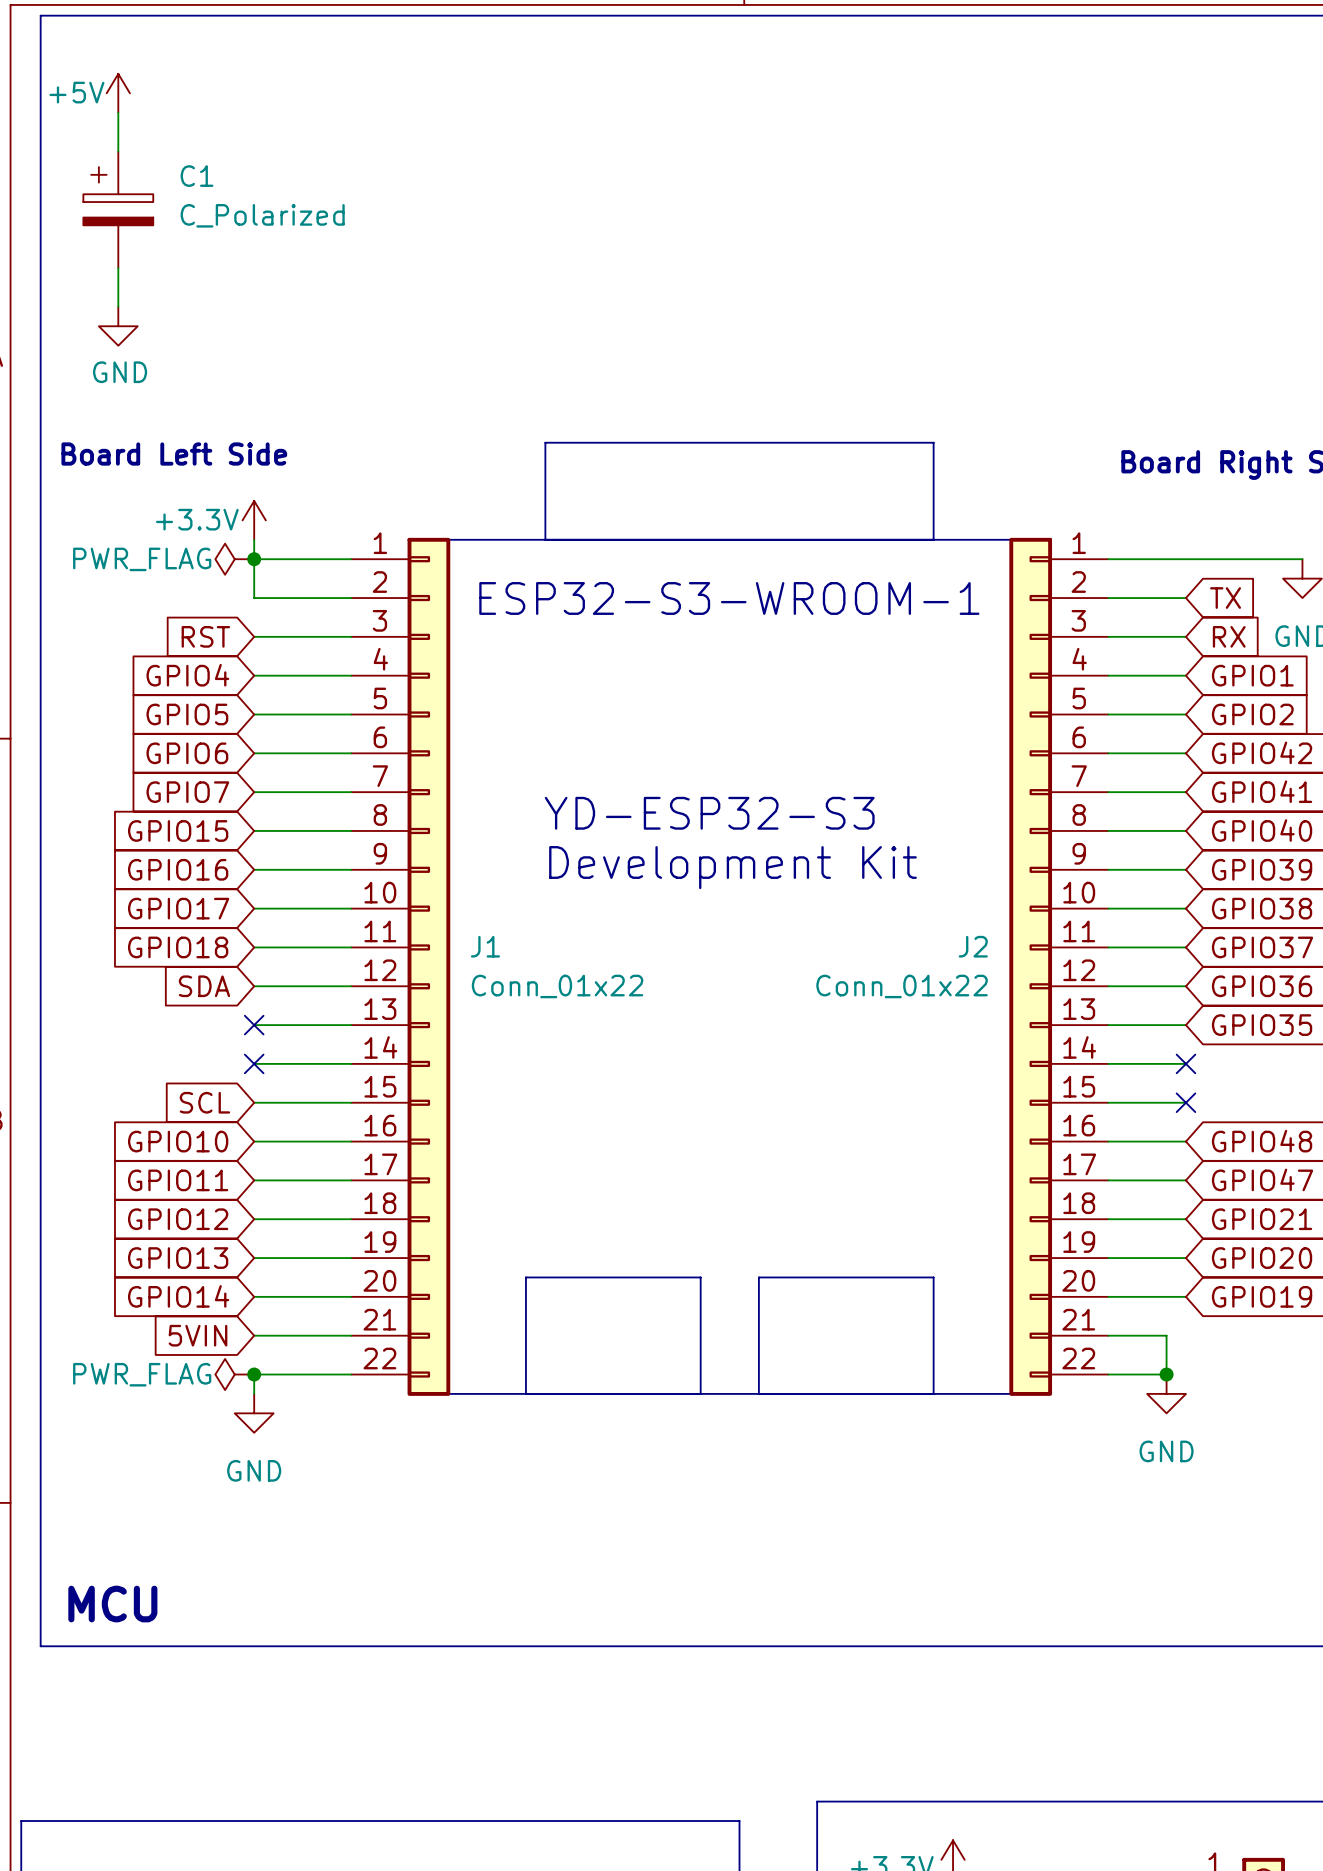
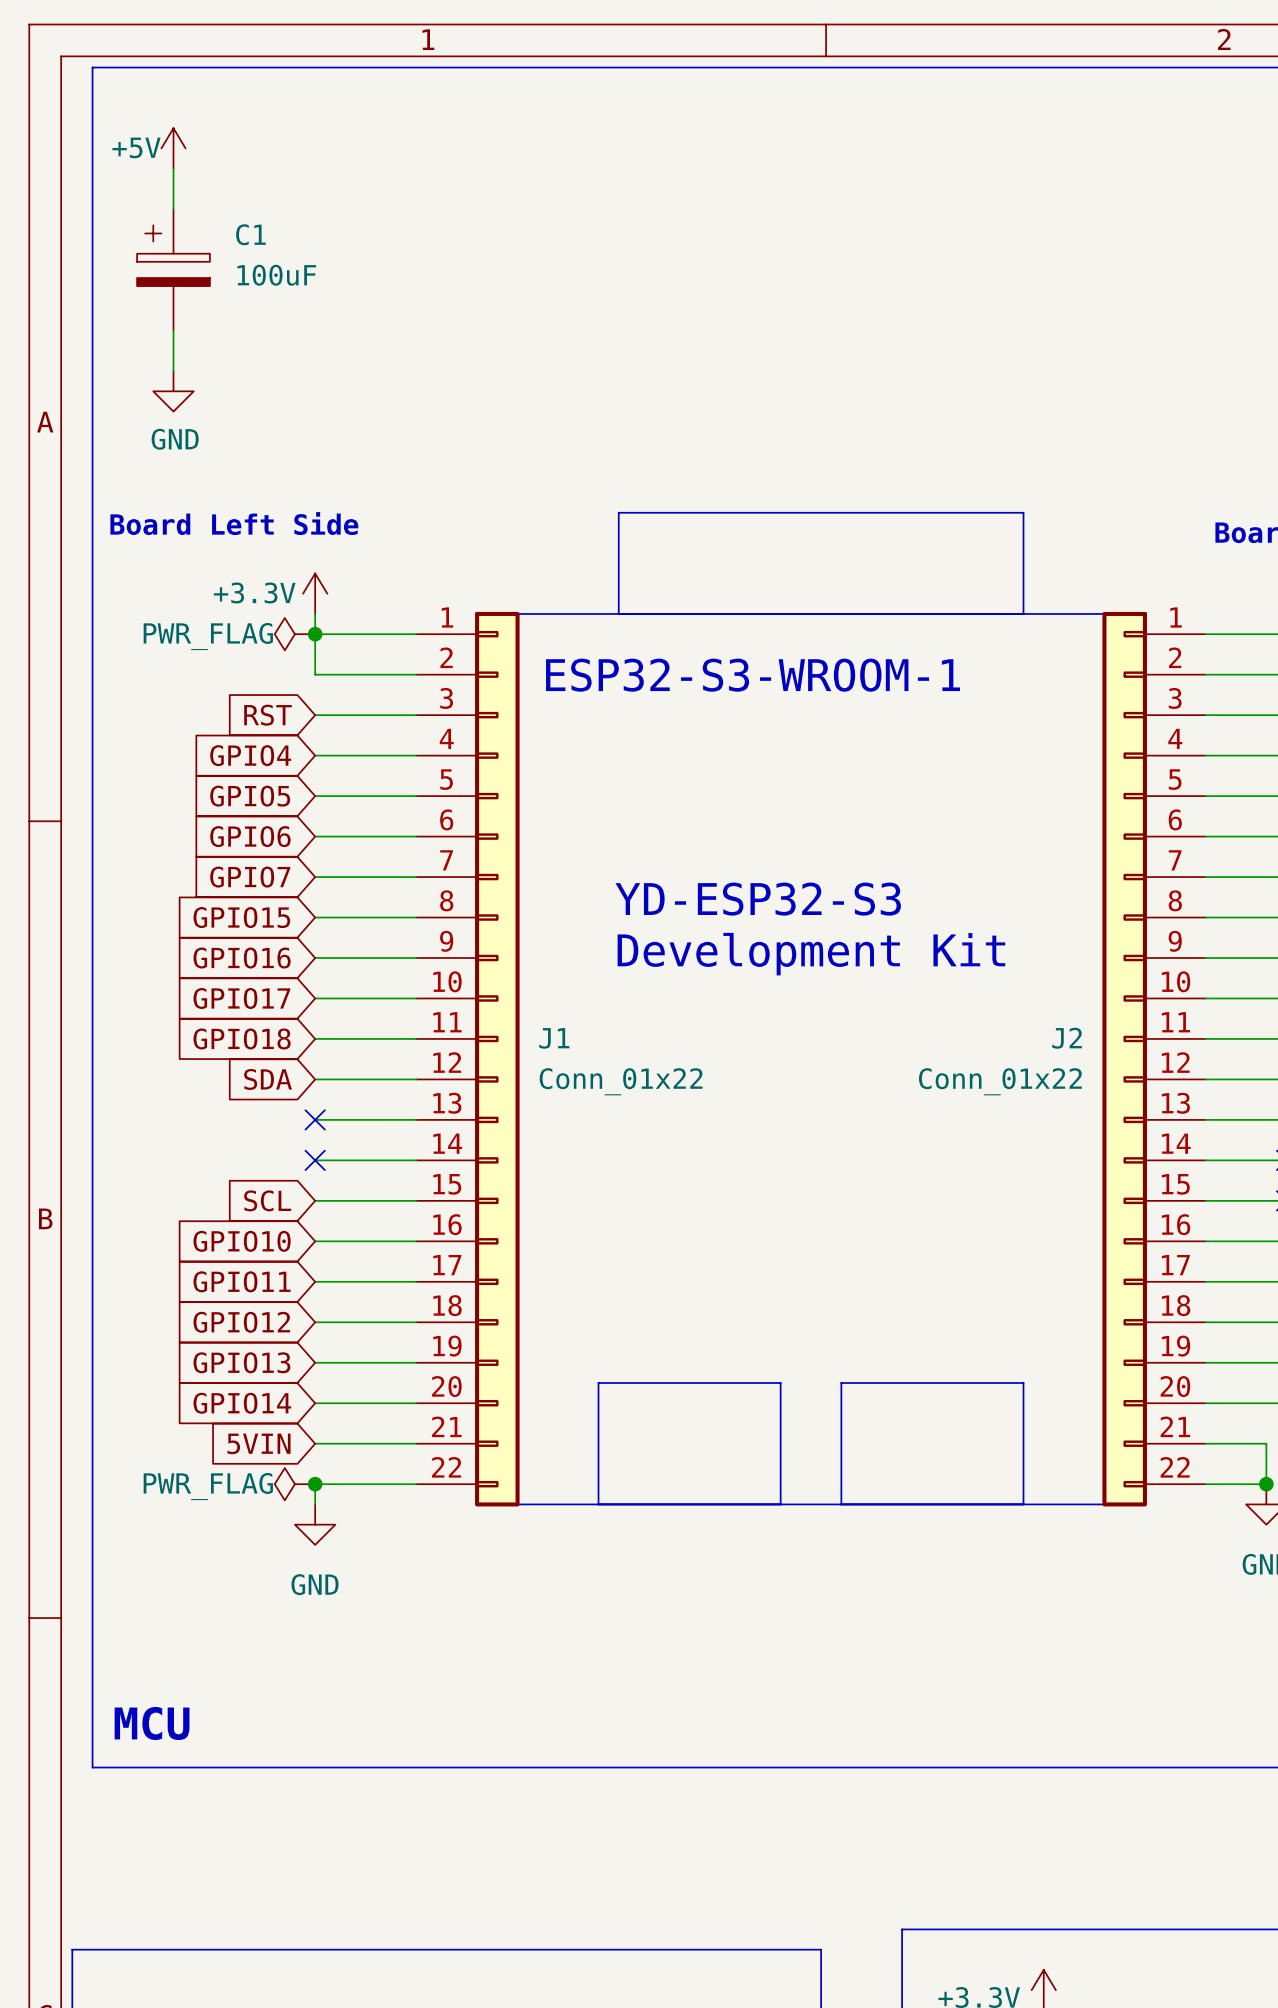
C1 value: C_Polarized (262, 215) -> 100uF (276, 275)

